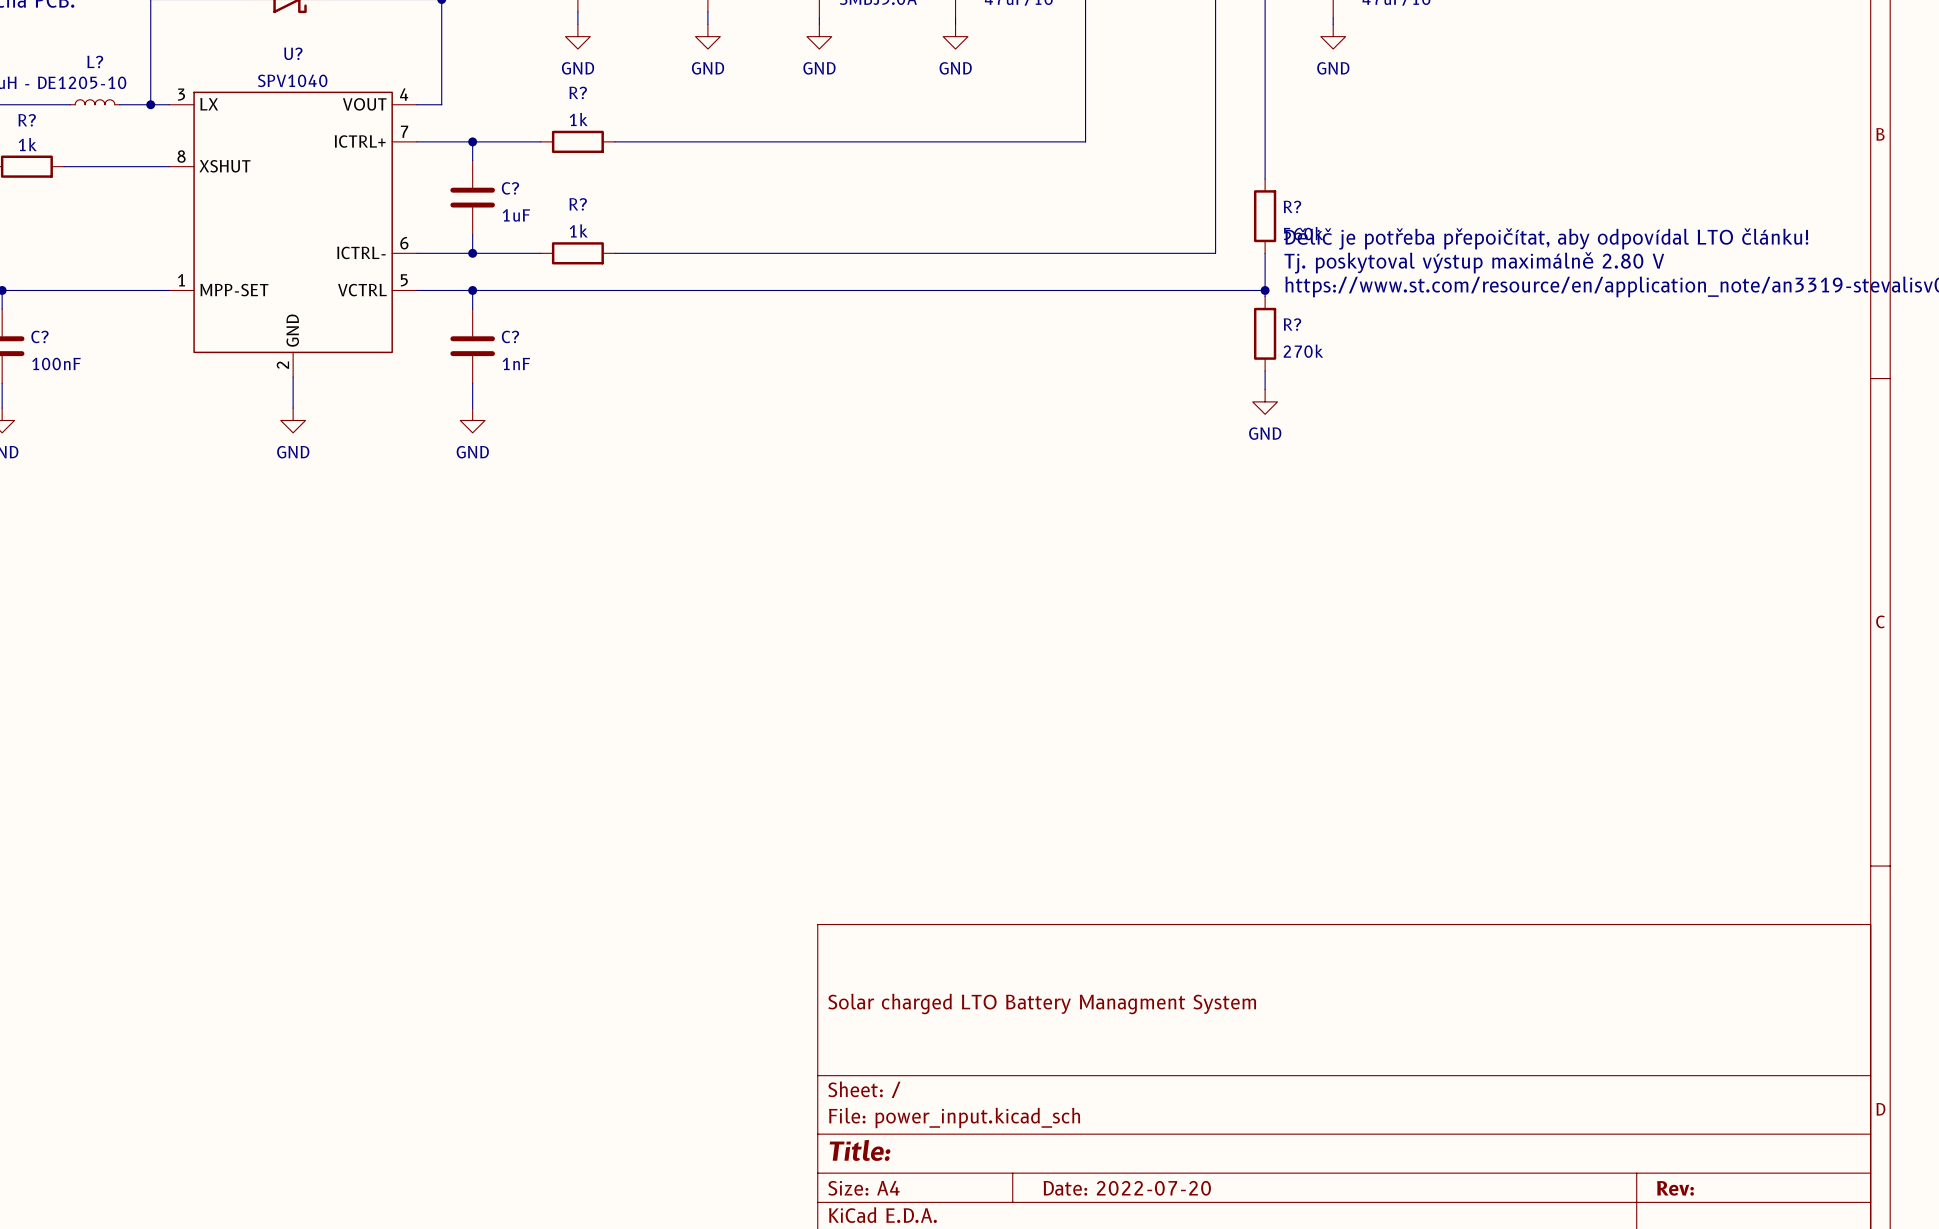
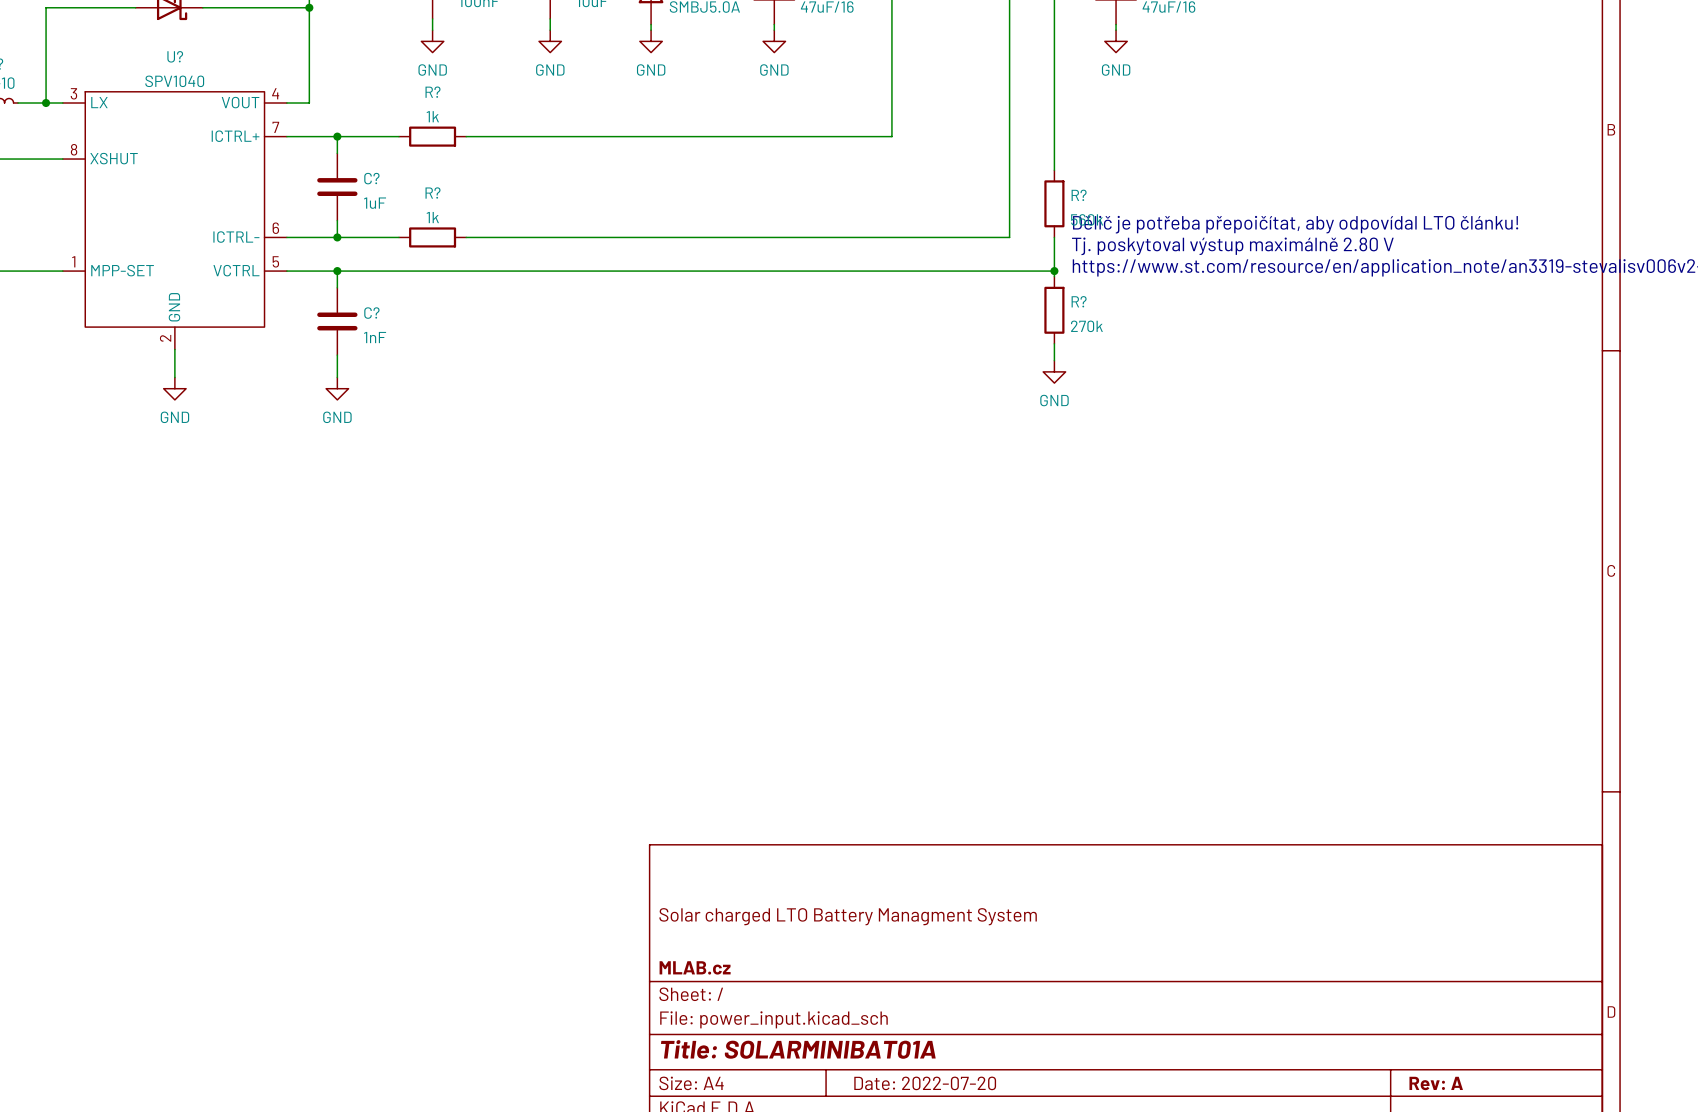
title block: none -> MLAB.cz (695, 967)
title block: Title: (860, 1150) -> Title: SOLARMINIBAT01A (798, 1049)
title block: Rev: (1675, 1188) -> Rev: A (1436, 1083)

